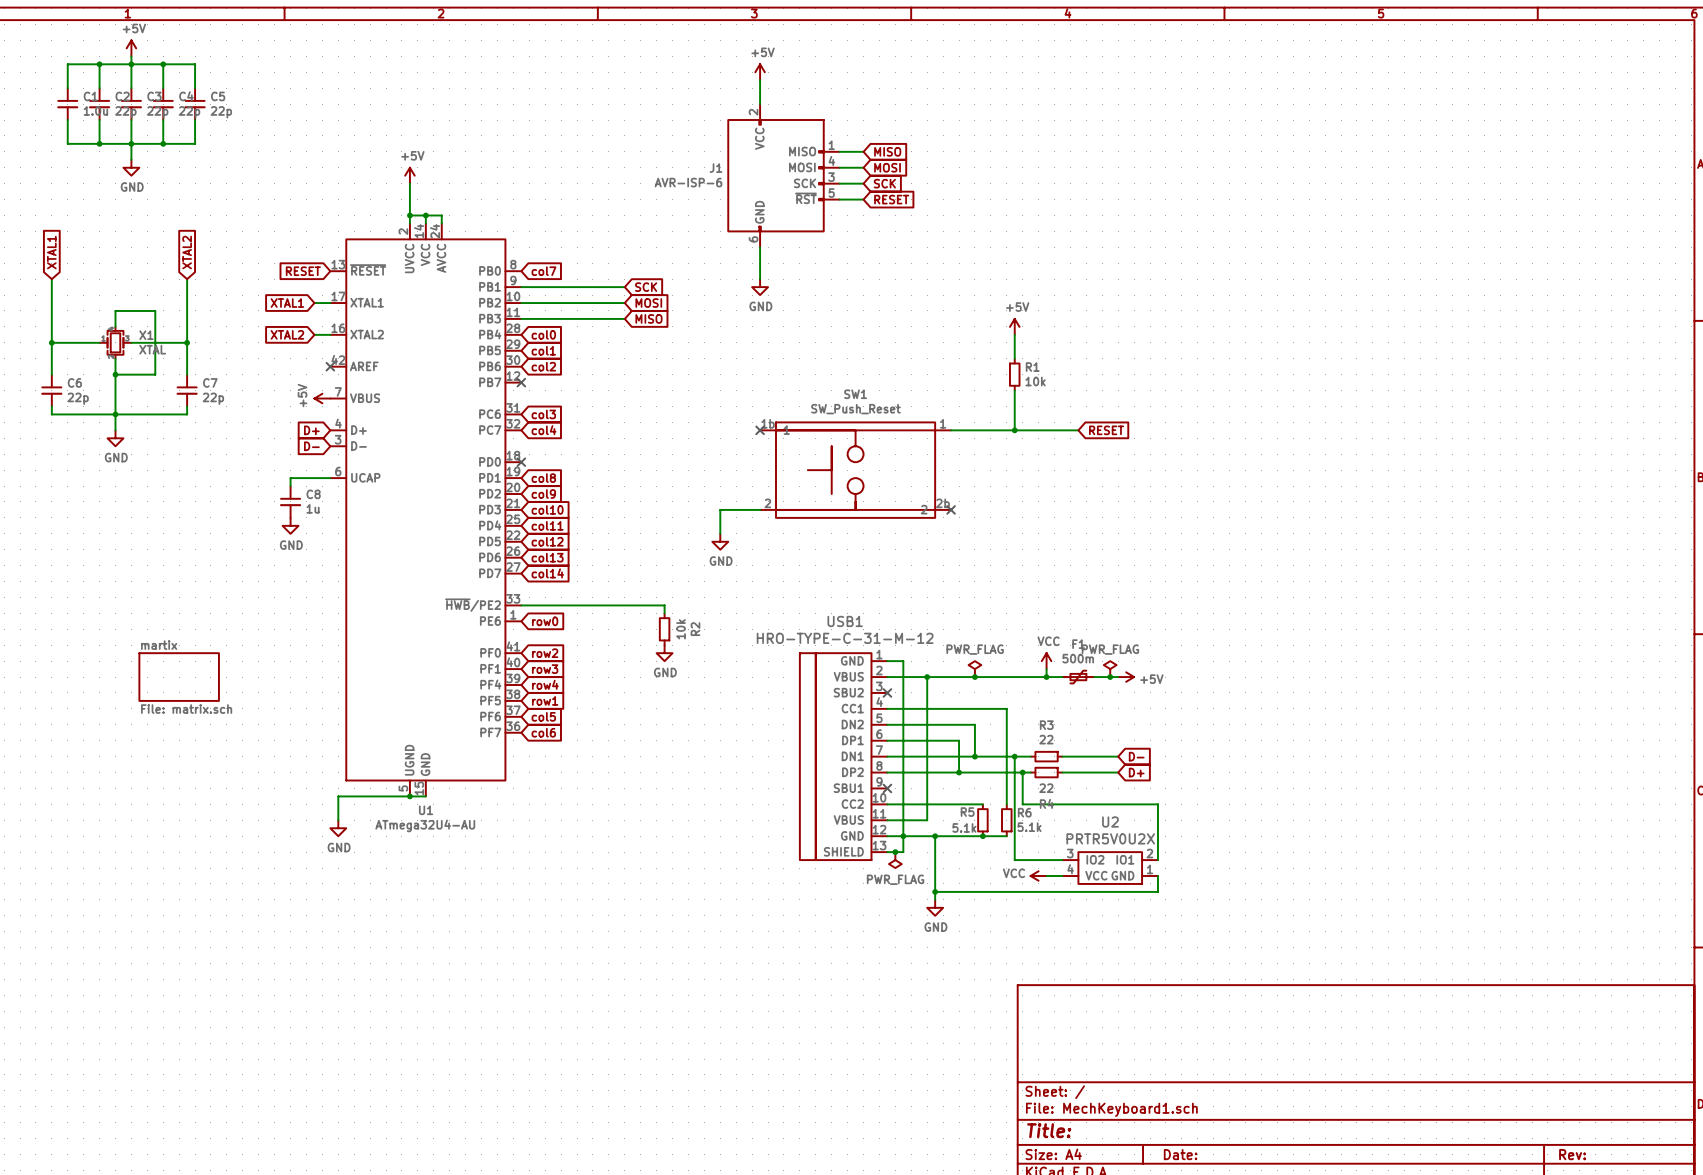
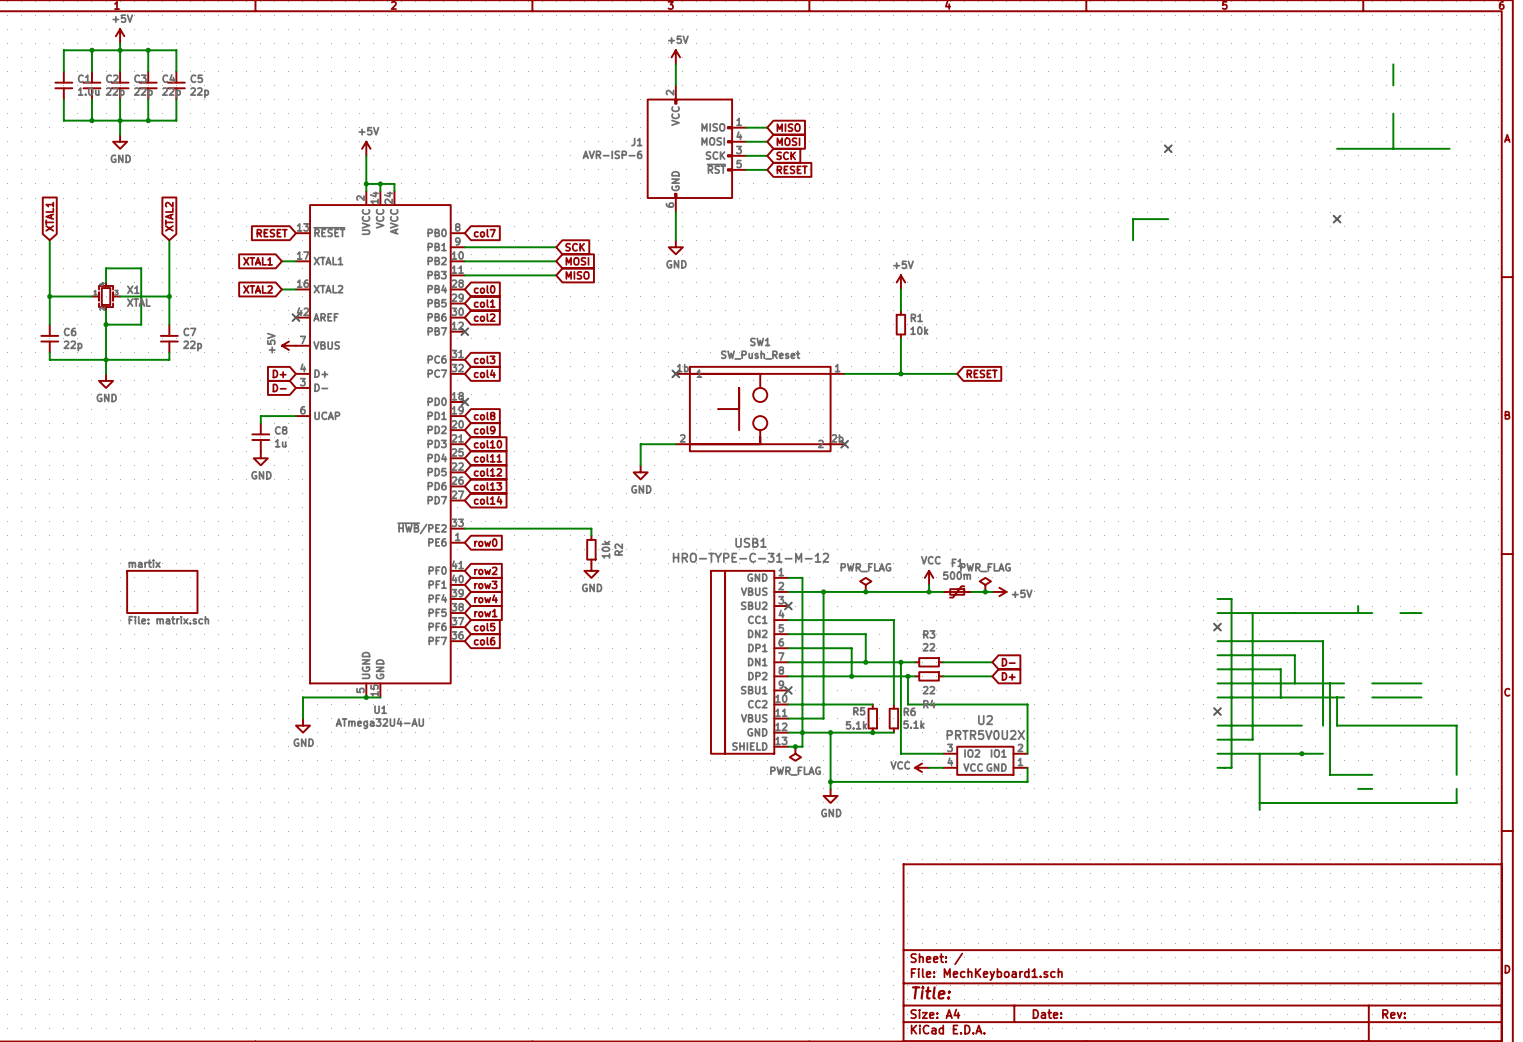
wire: none -> (1393, 64) (1393, 85)
wire: none -> (1393, 113) (1393, 148)
no-connect mark: none -> (1168, 148)
wire: none -> (1337, 148) (1449, 148)
wire: none -> (1168, 219) (1133, 219) (1133, 240)
no-connect mark: none -> (1337, 219)
wire: none -> (1217, 598) (1231, 598) (1231, 767) (1217, 767)
wire: none -> (1358, 606) (1358, 613)
wire: none -> (1217, 613) (1372, 613)
wire: none -> (1252, 613) (1252, 739) (1217, 739)
wire: none -> (1400, 613) (1421, 613)
no-connect mark: none -> (1217, 627)
wire: none -> (1217, 641) (1322, 641) (1322, 725)
wire: none -> (1217, 655) (1294, 655) (1294, 683)
wire: none -> (1217, 669) (1280, 669) (1280, 697)
wire: none -> (1217, 683) (1344, 683)
wire: none -> (1330, 683) (1330, 774) (1372, 774)
wire: none -> (1372, 683) (1421, 683)
wire: none -> (1217, 697) (1344, 697)
wire: none -> (1337, 697) (1337, 725) (1456, 725) (1456, 774)
wire: none -> (1372, 697) (1421, 697)
no-connect mark: none -> (1217, 711)
wire: none -> (1217, 725) (1301, 725)
wire: none -> (1217, 753) (1322, 753)
wire: none -> (1259, 753) (1259, 810)
junction: none -> (1301, 753)
wire: none -> (1358, 788) (1372, 788)
wire: none -> (1456, 788) (1456, 802) (1259, 802)

